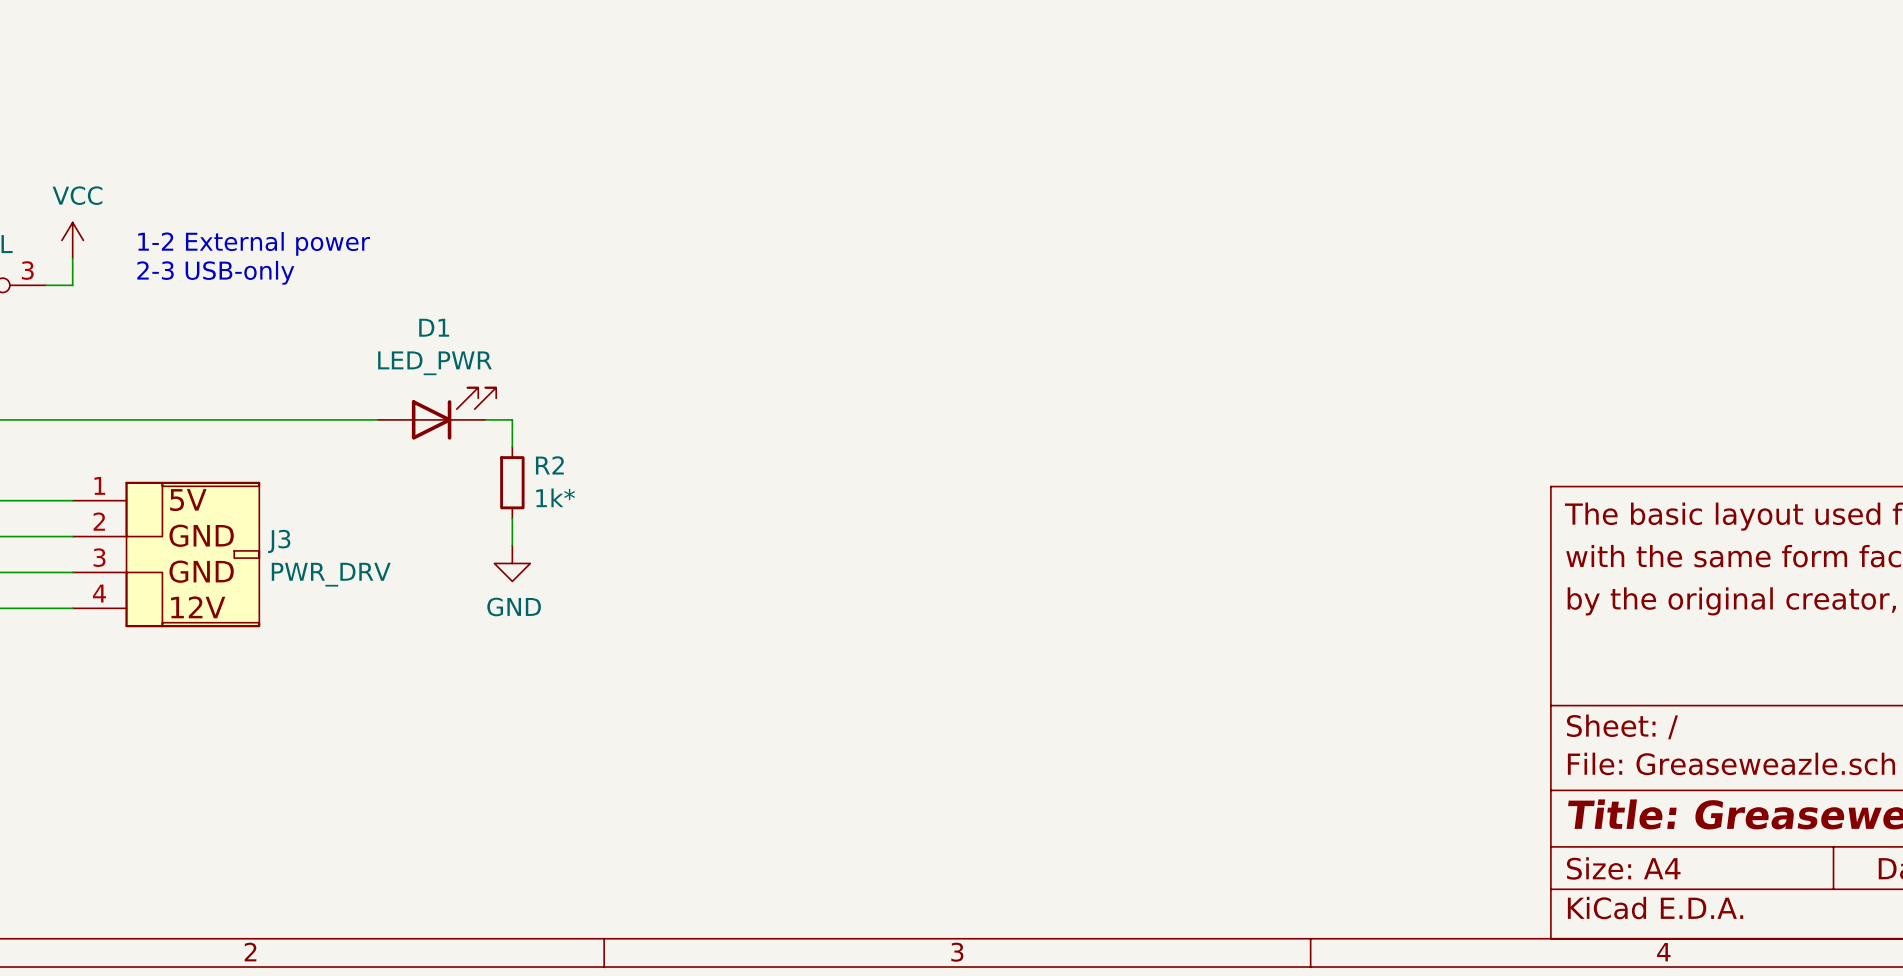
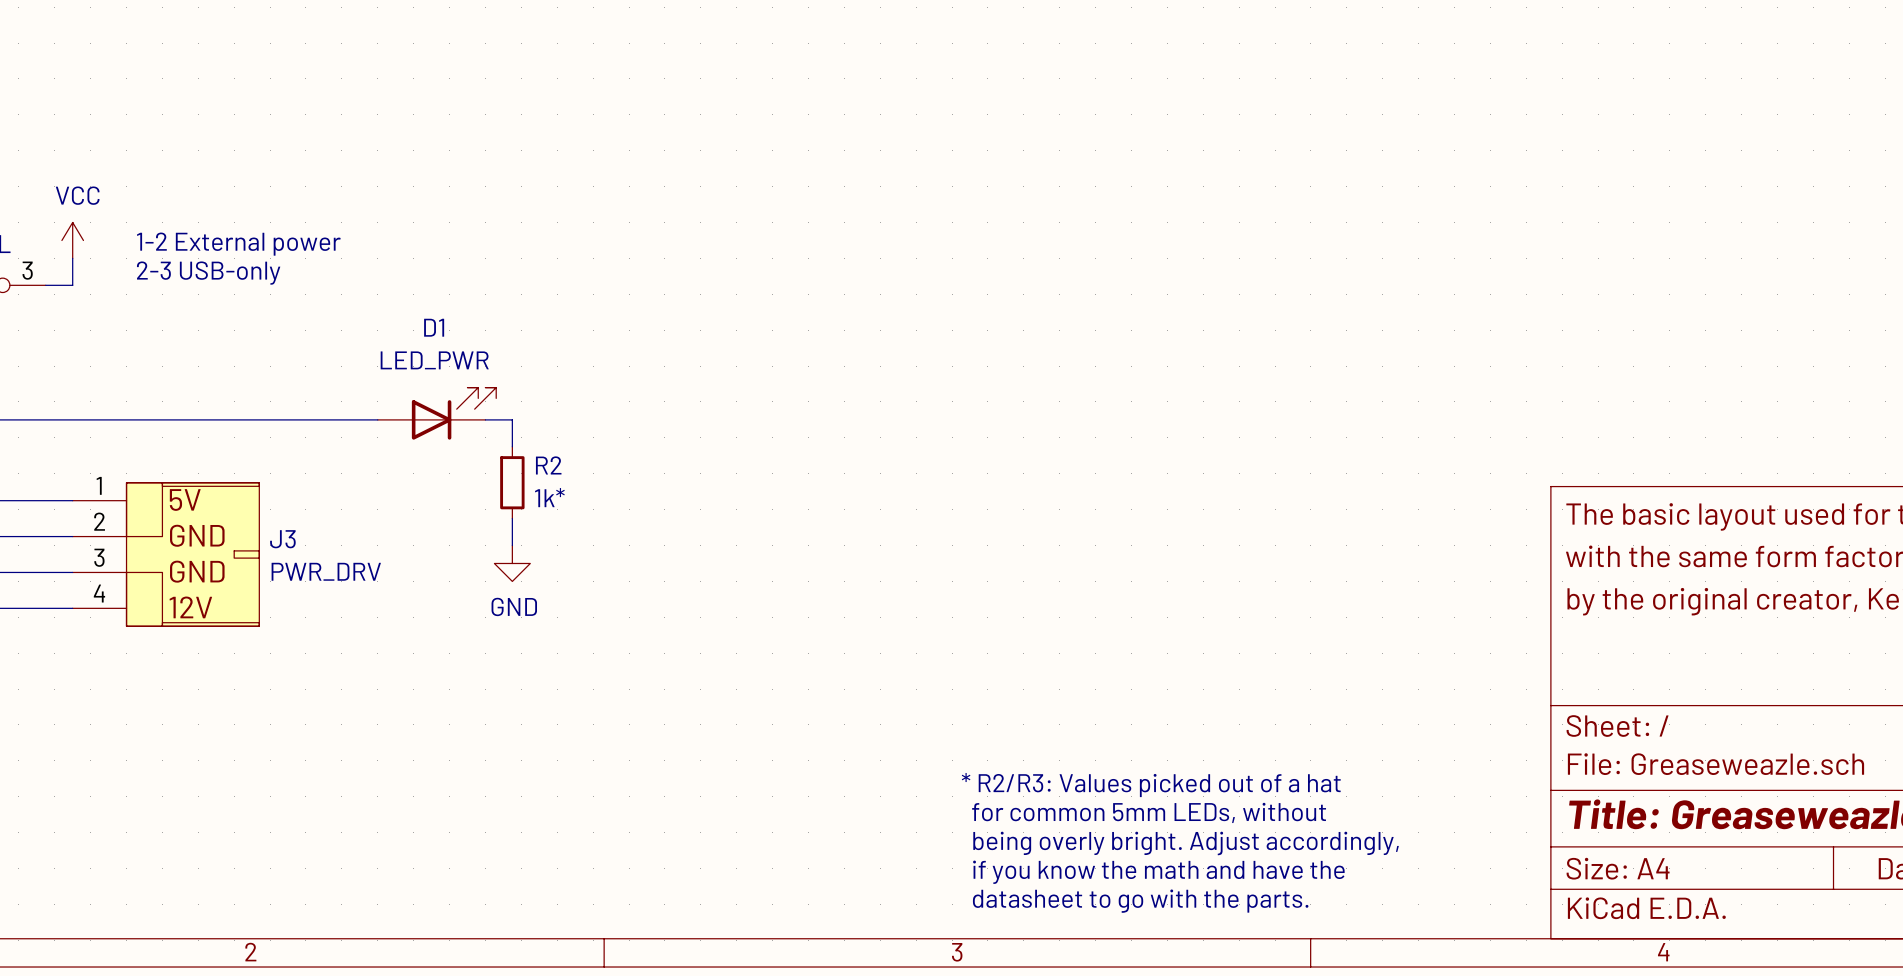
text: none -> * R2/R3: Values picked out of a hat (1151, 785)
text: none -> for common 5mm LEDs, without (1149, 812)
text: none -> being overly bright. Adjust accordingly, (1186, 843)
text: none -> if you know the math and have the (1158, 872)
text: none -> datasheet to go with the parts. (1140, 901)

